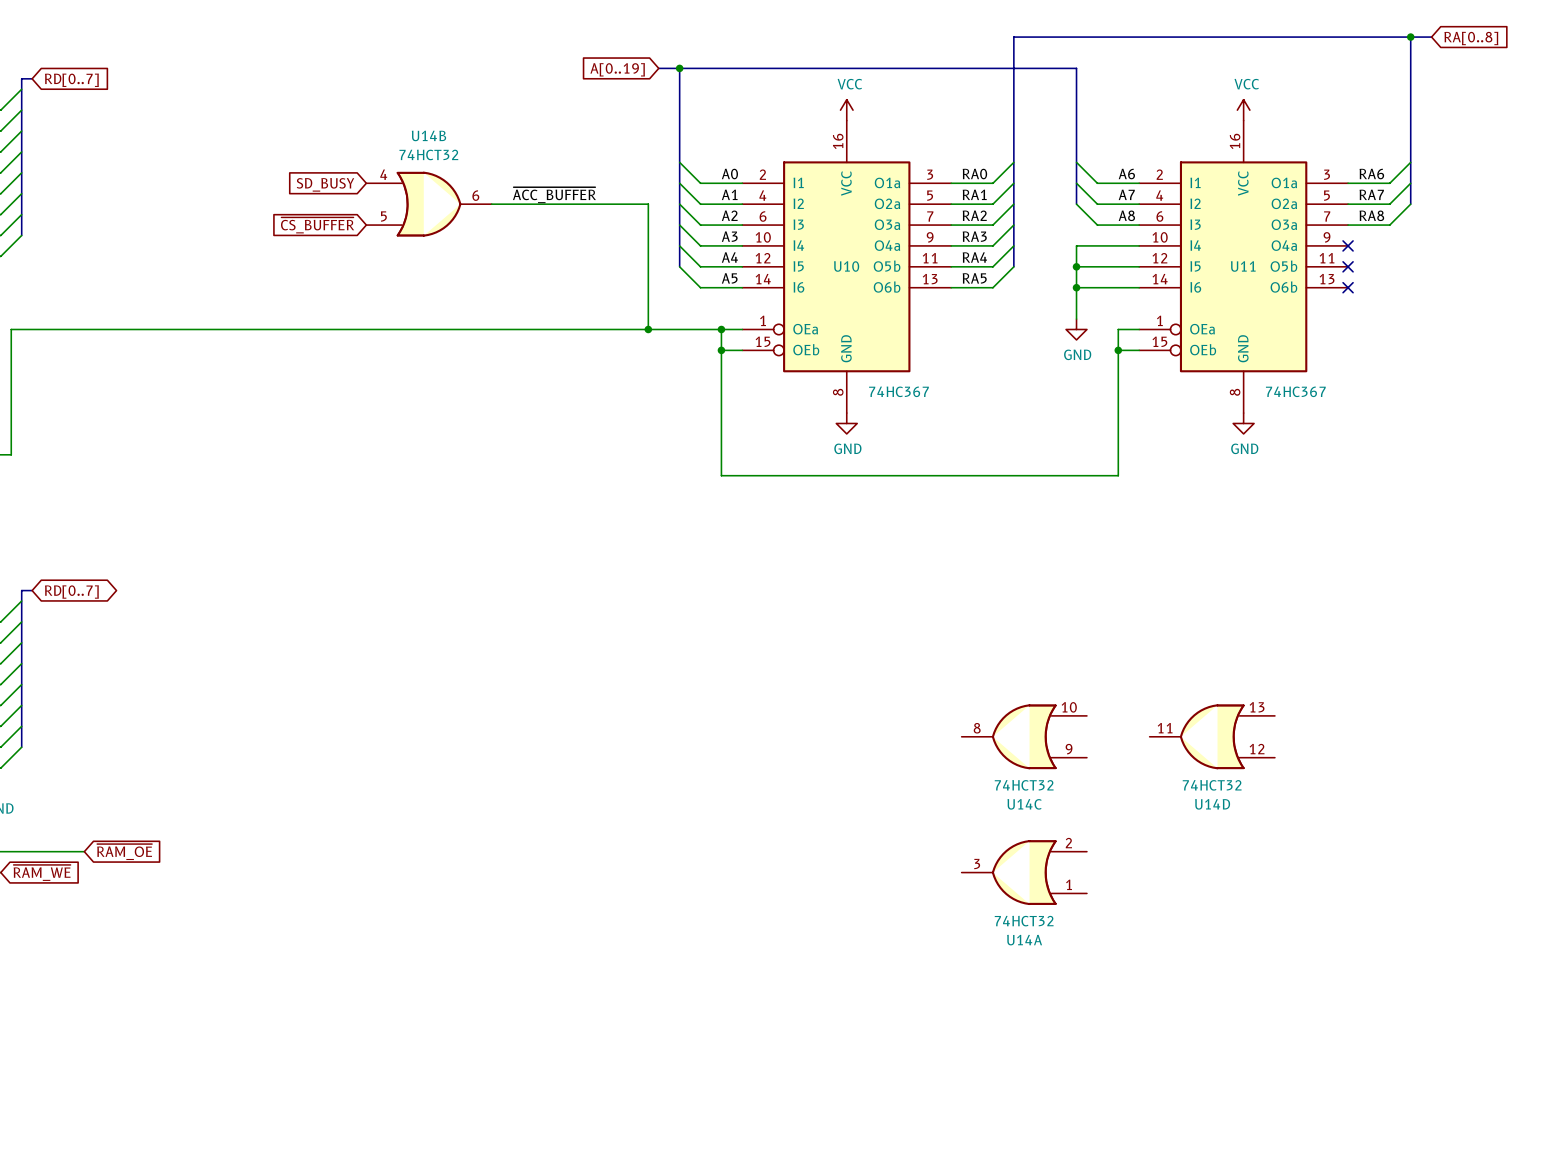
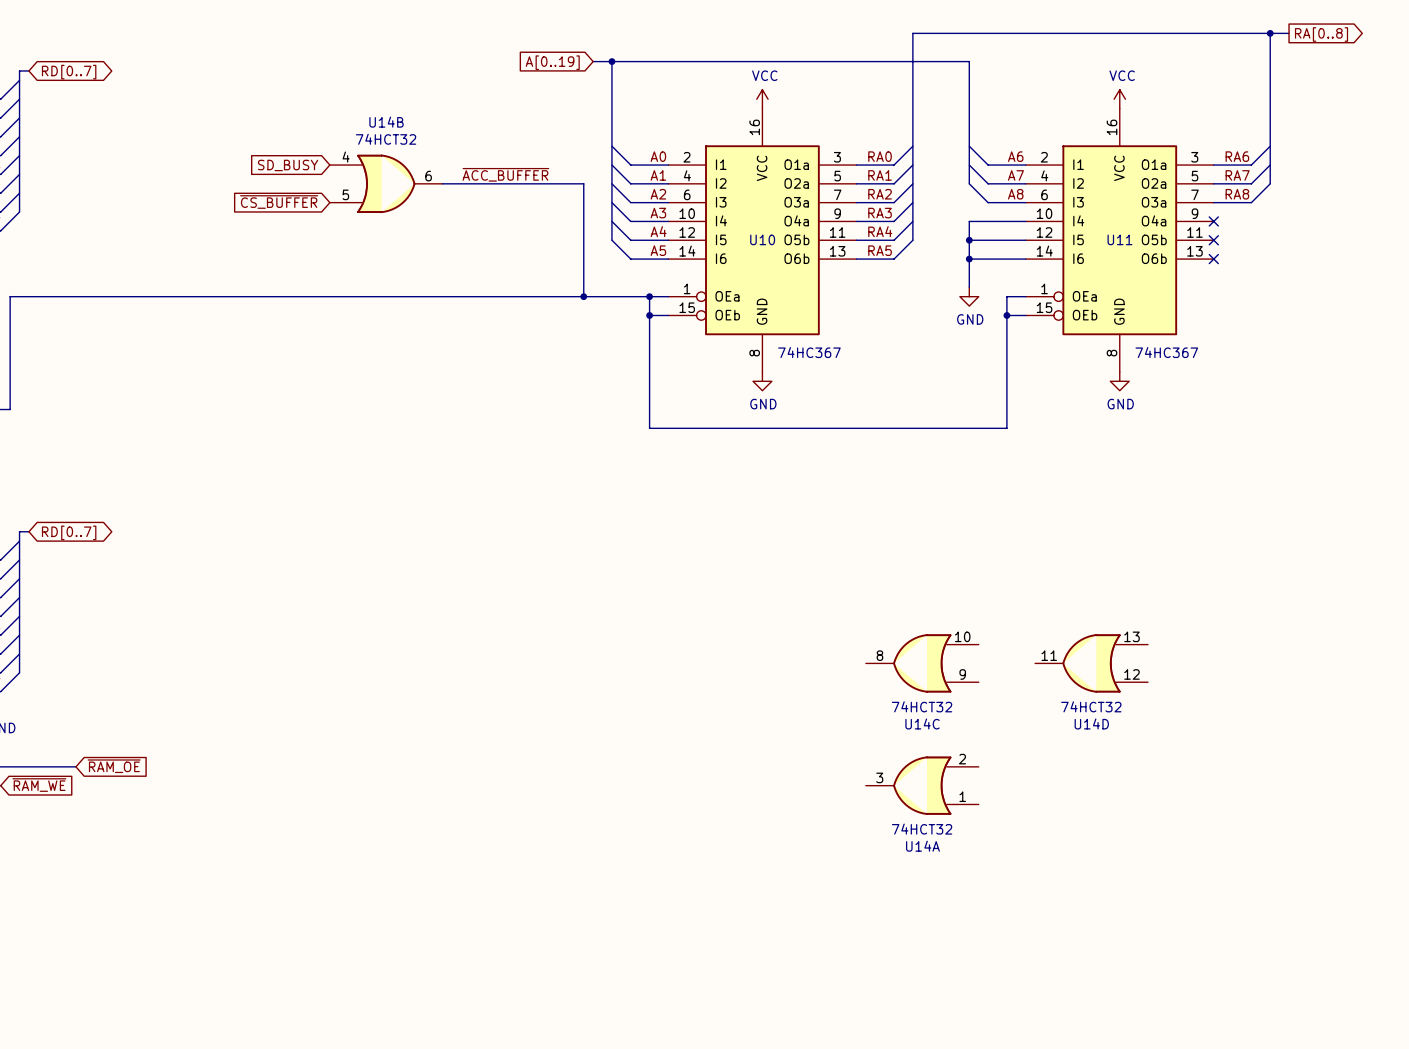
global label shape: input (1471, 38) -> output (1321, 34)
global label shape: input (71, 80) -> bidirectional (69, 72)

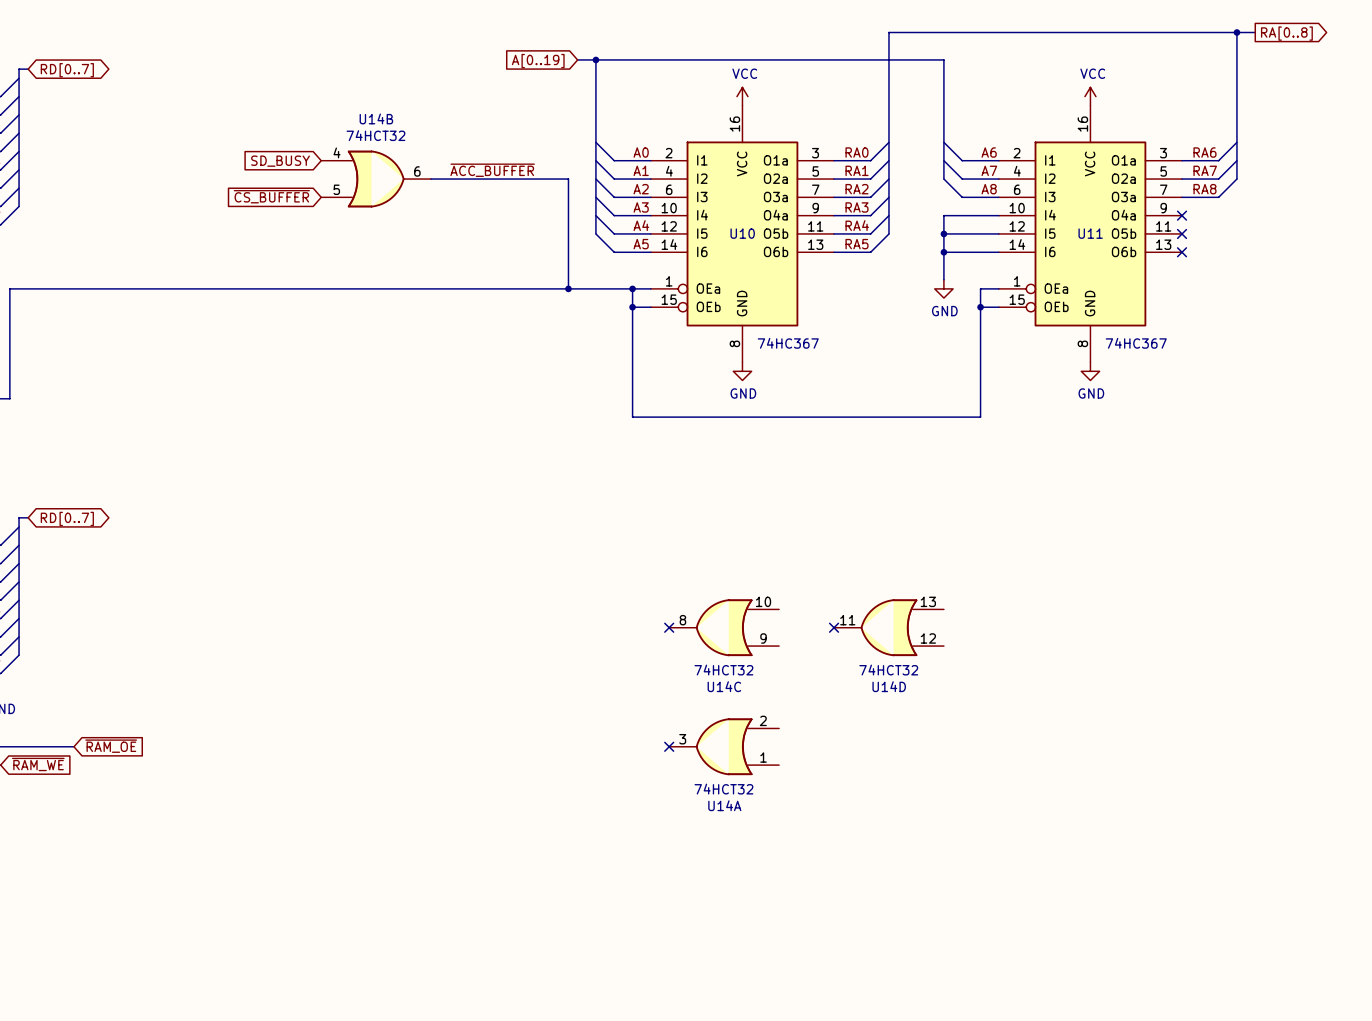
no-connect mark: none -> (669, 627)
no-connect mark: none -> (834, 627)
U14C position: (922, 663) -> (724, 627)
U14D position: (1091, 663) -> (888, 627)
no-connect mark: none -> (669, 746)
U14A position: (922, 785) -> (724, 746)

